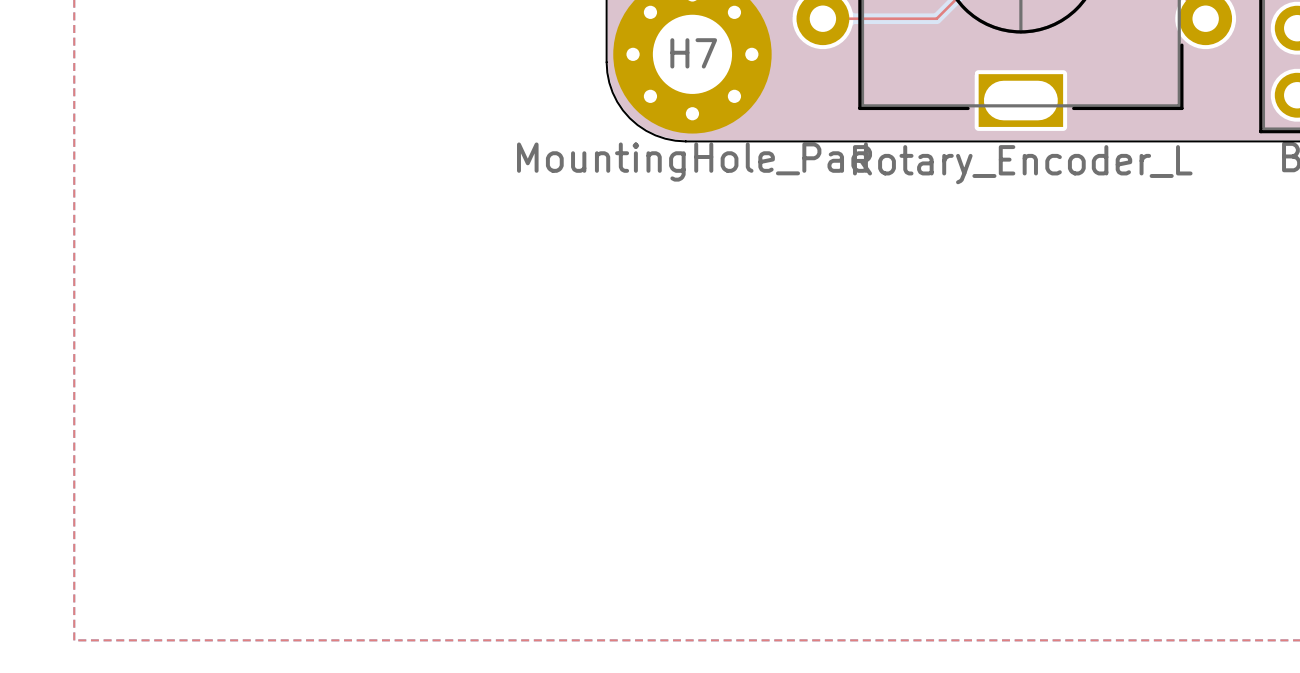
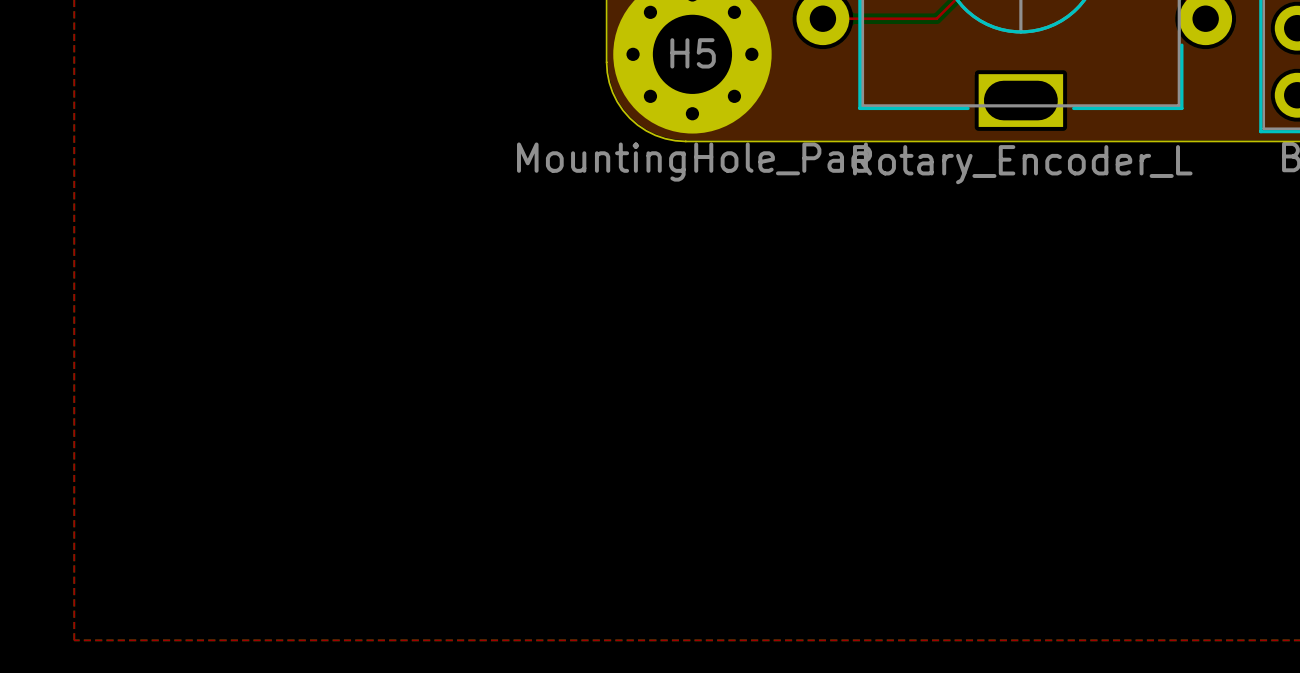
H7 name: H7 (693, 53) -> H5 (693, 53)

